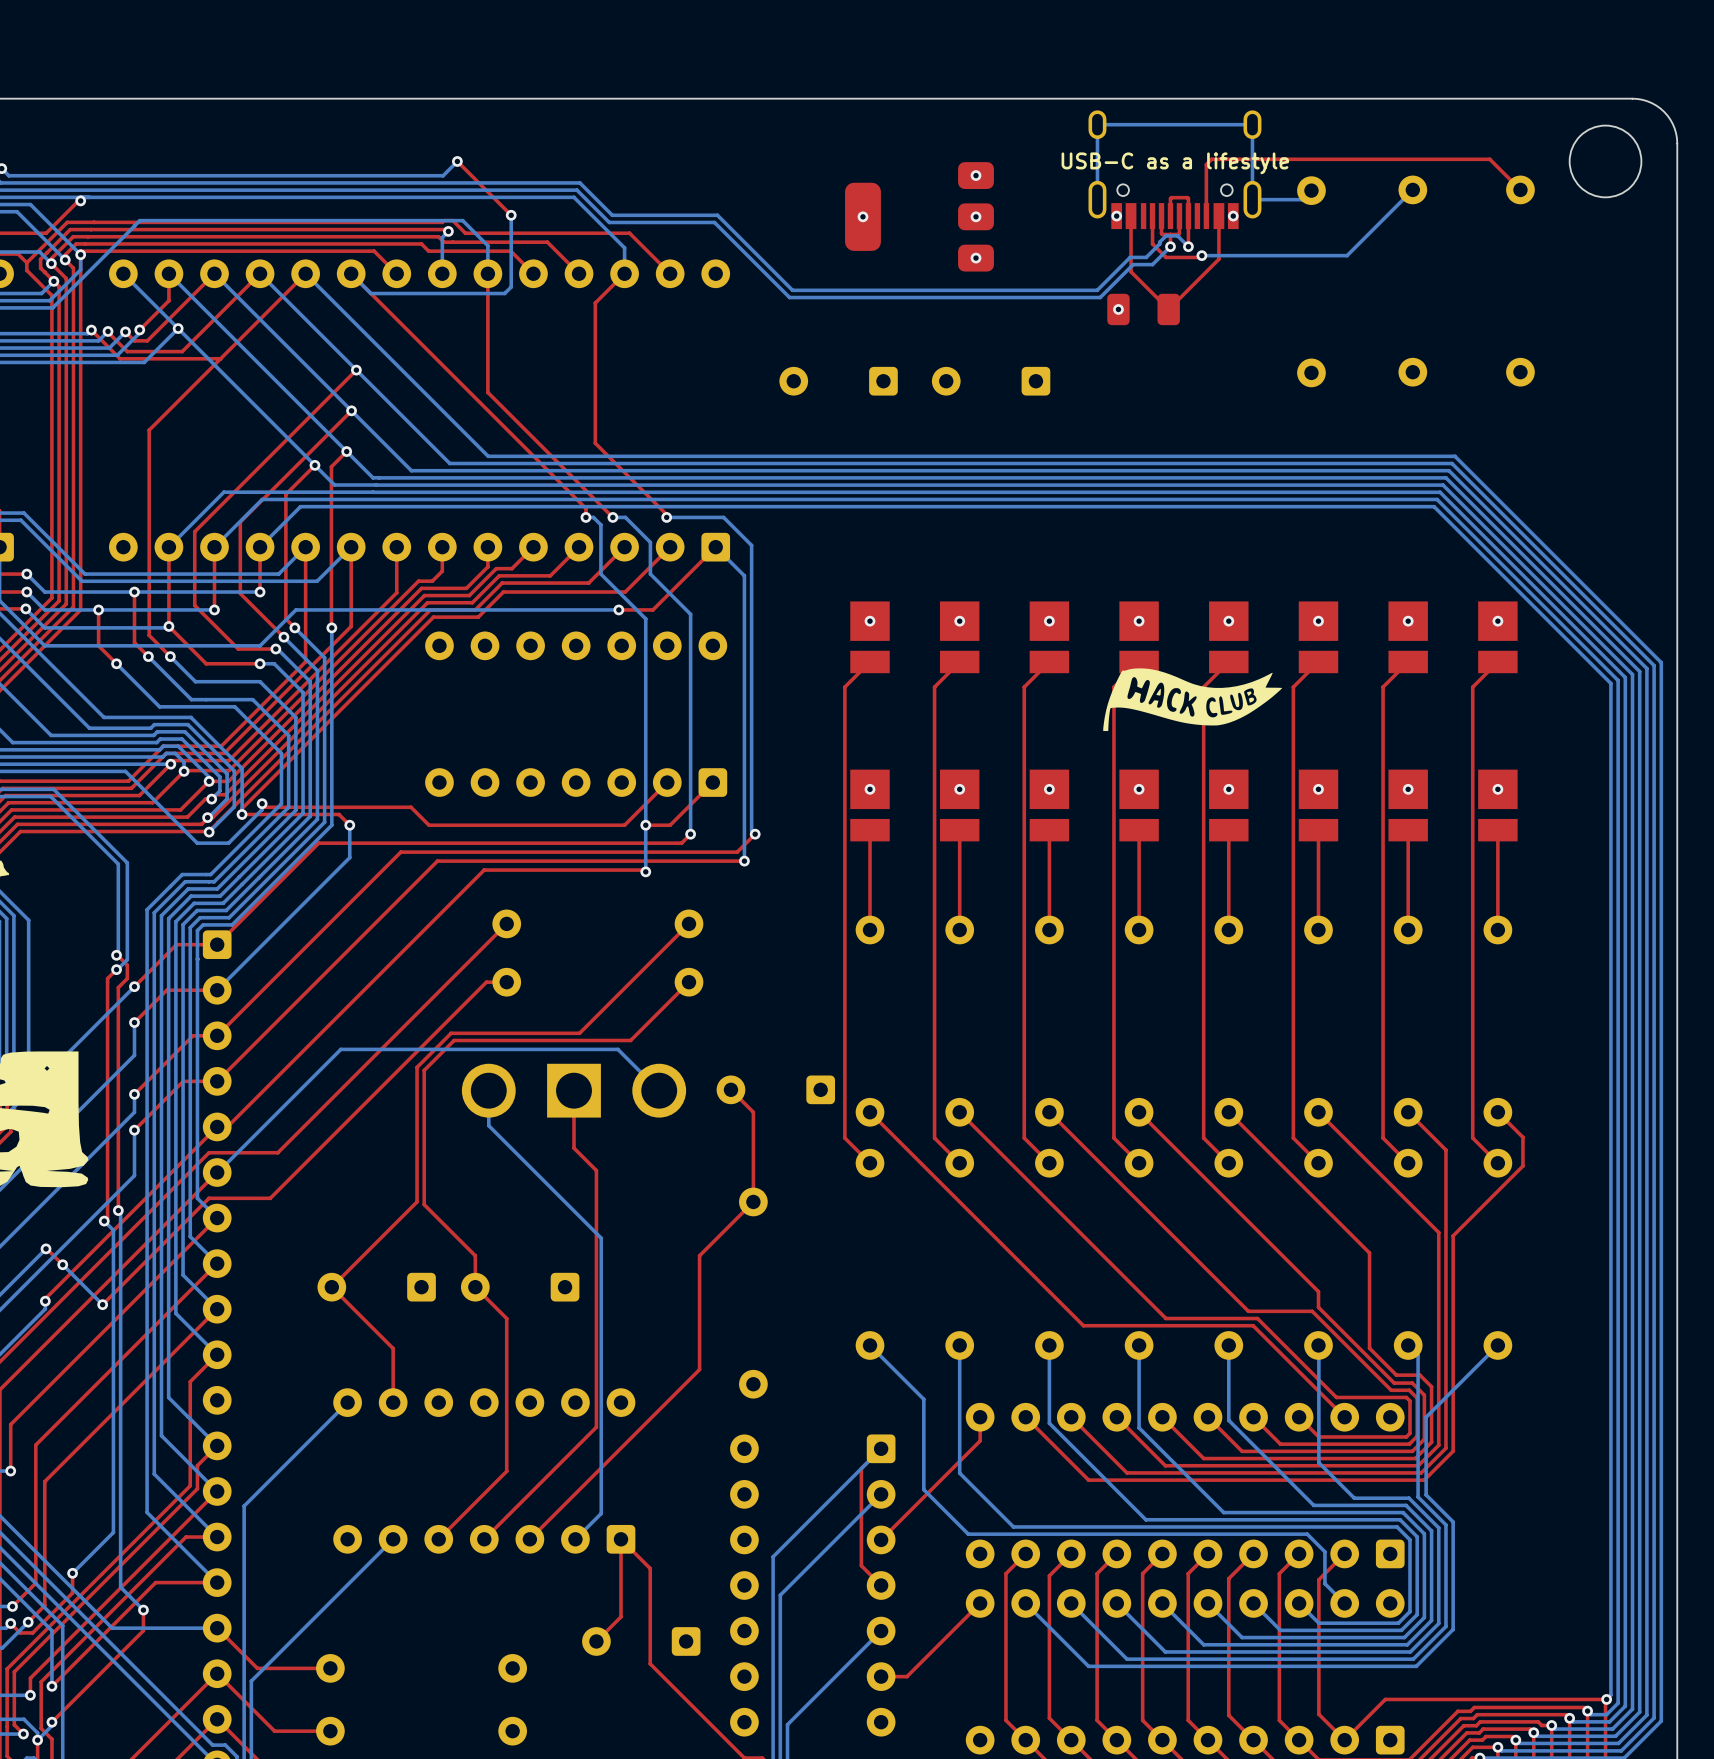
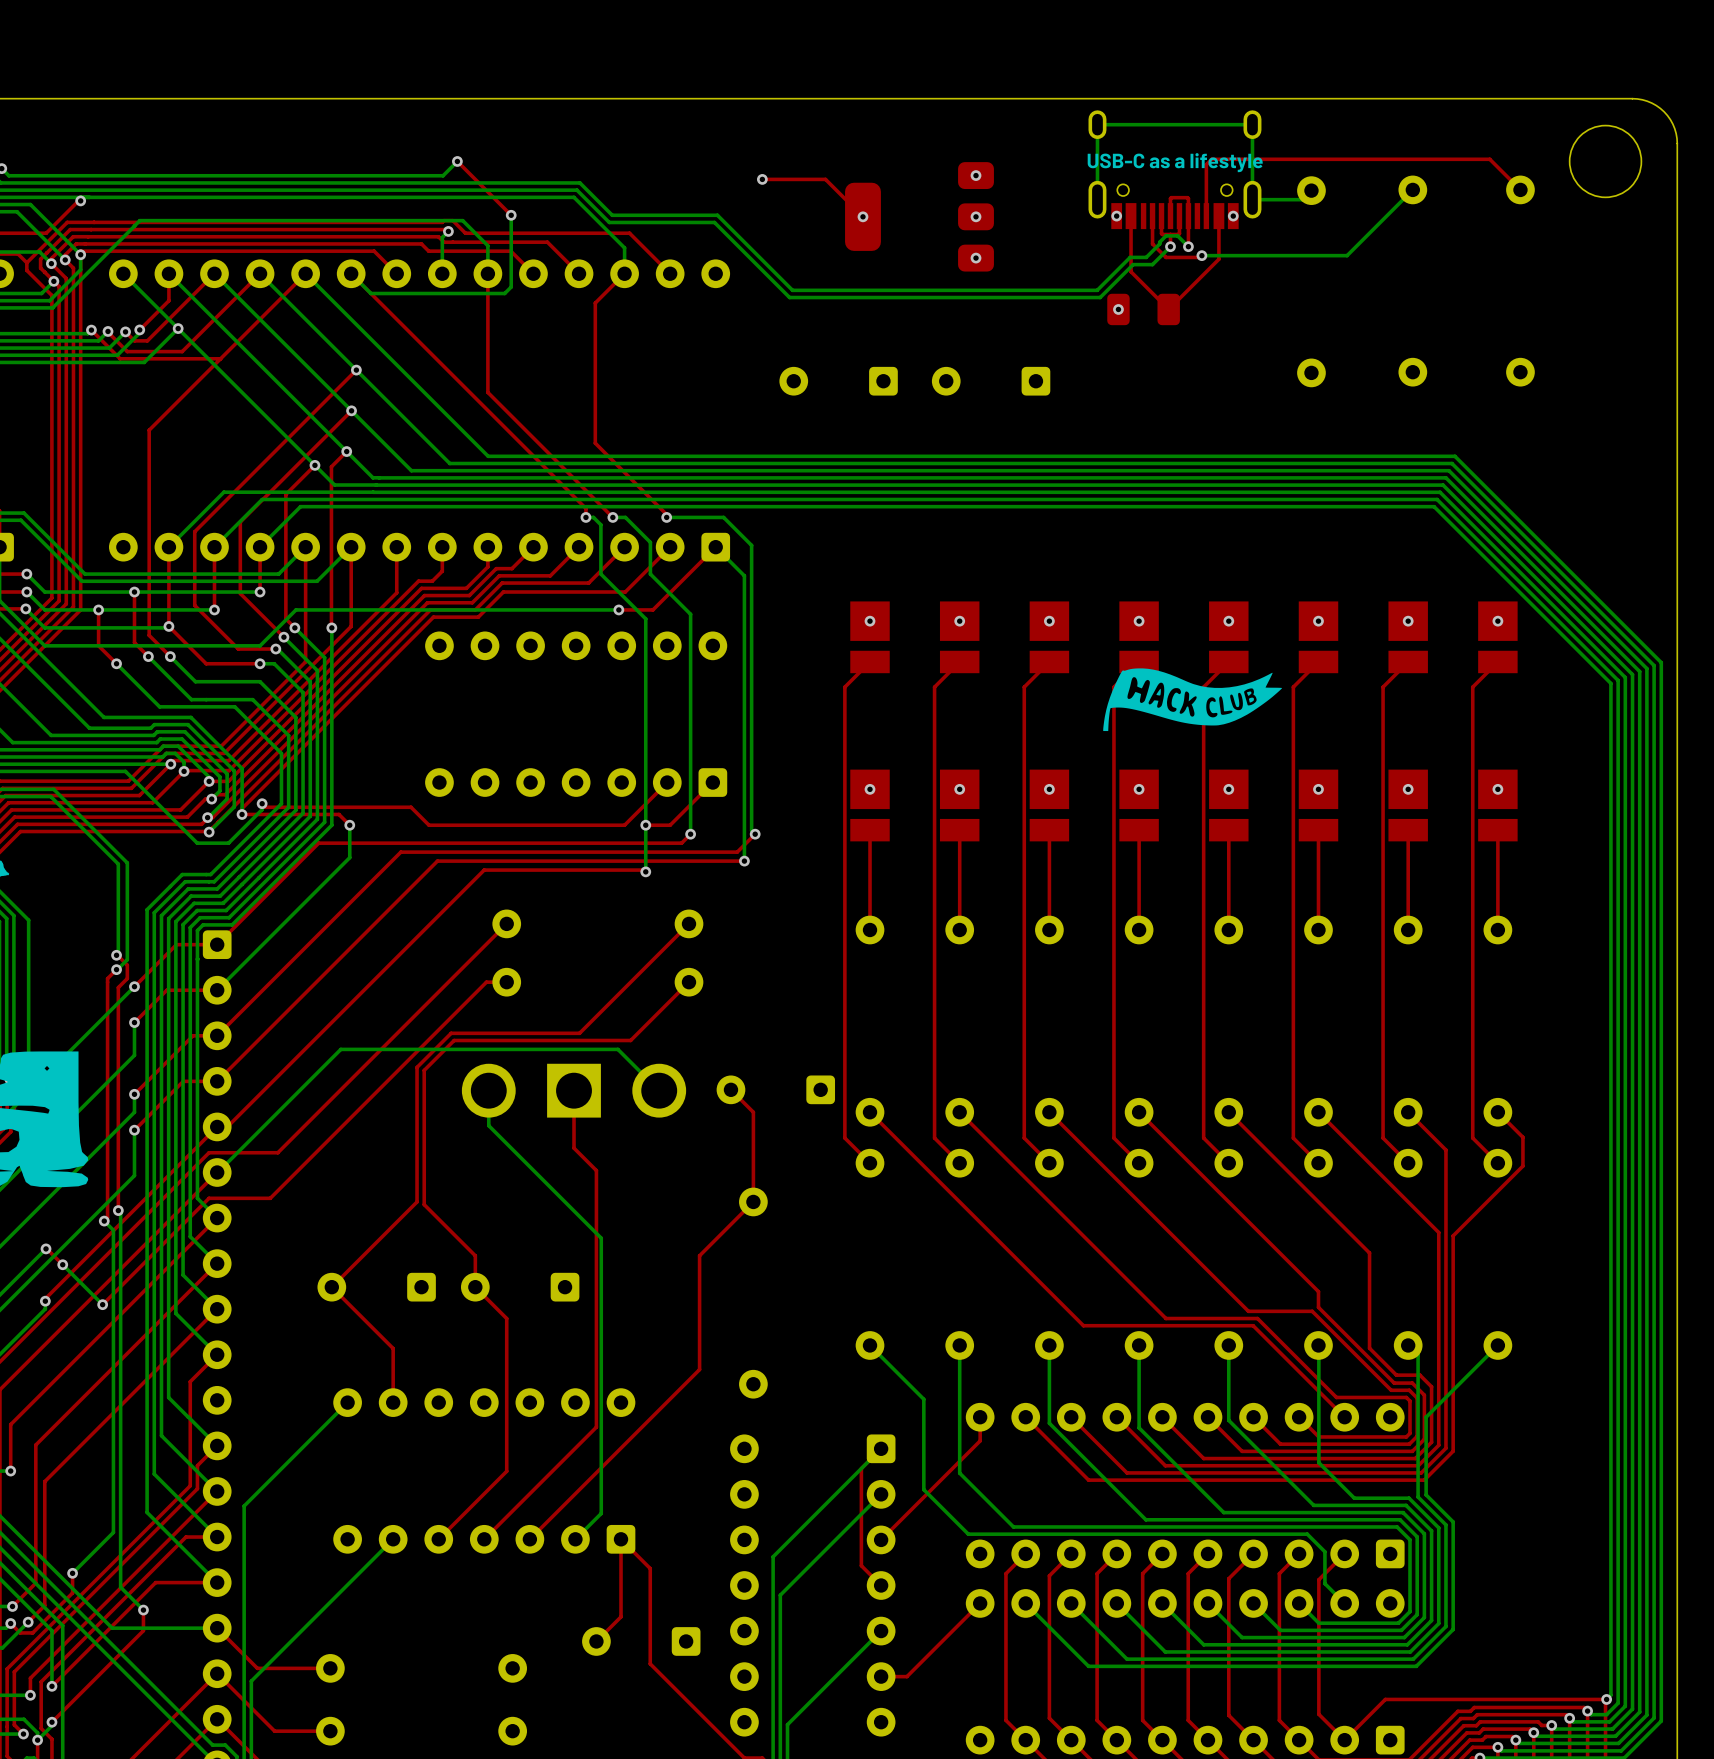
top track: none -> (762, 179) (825, 179) (862, 216)
via: none -> (762, 179)

